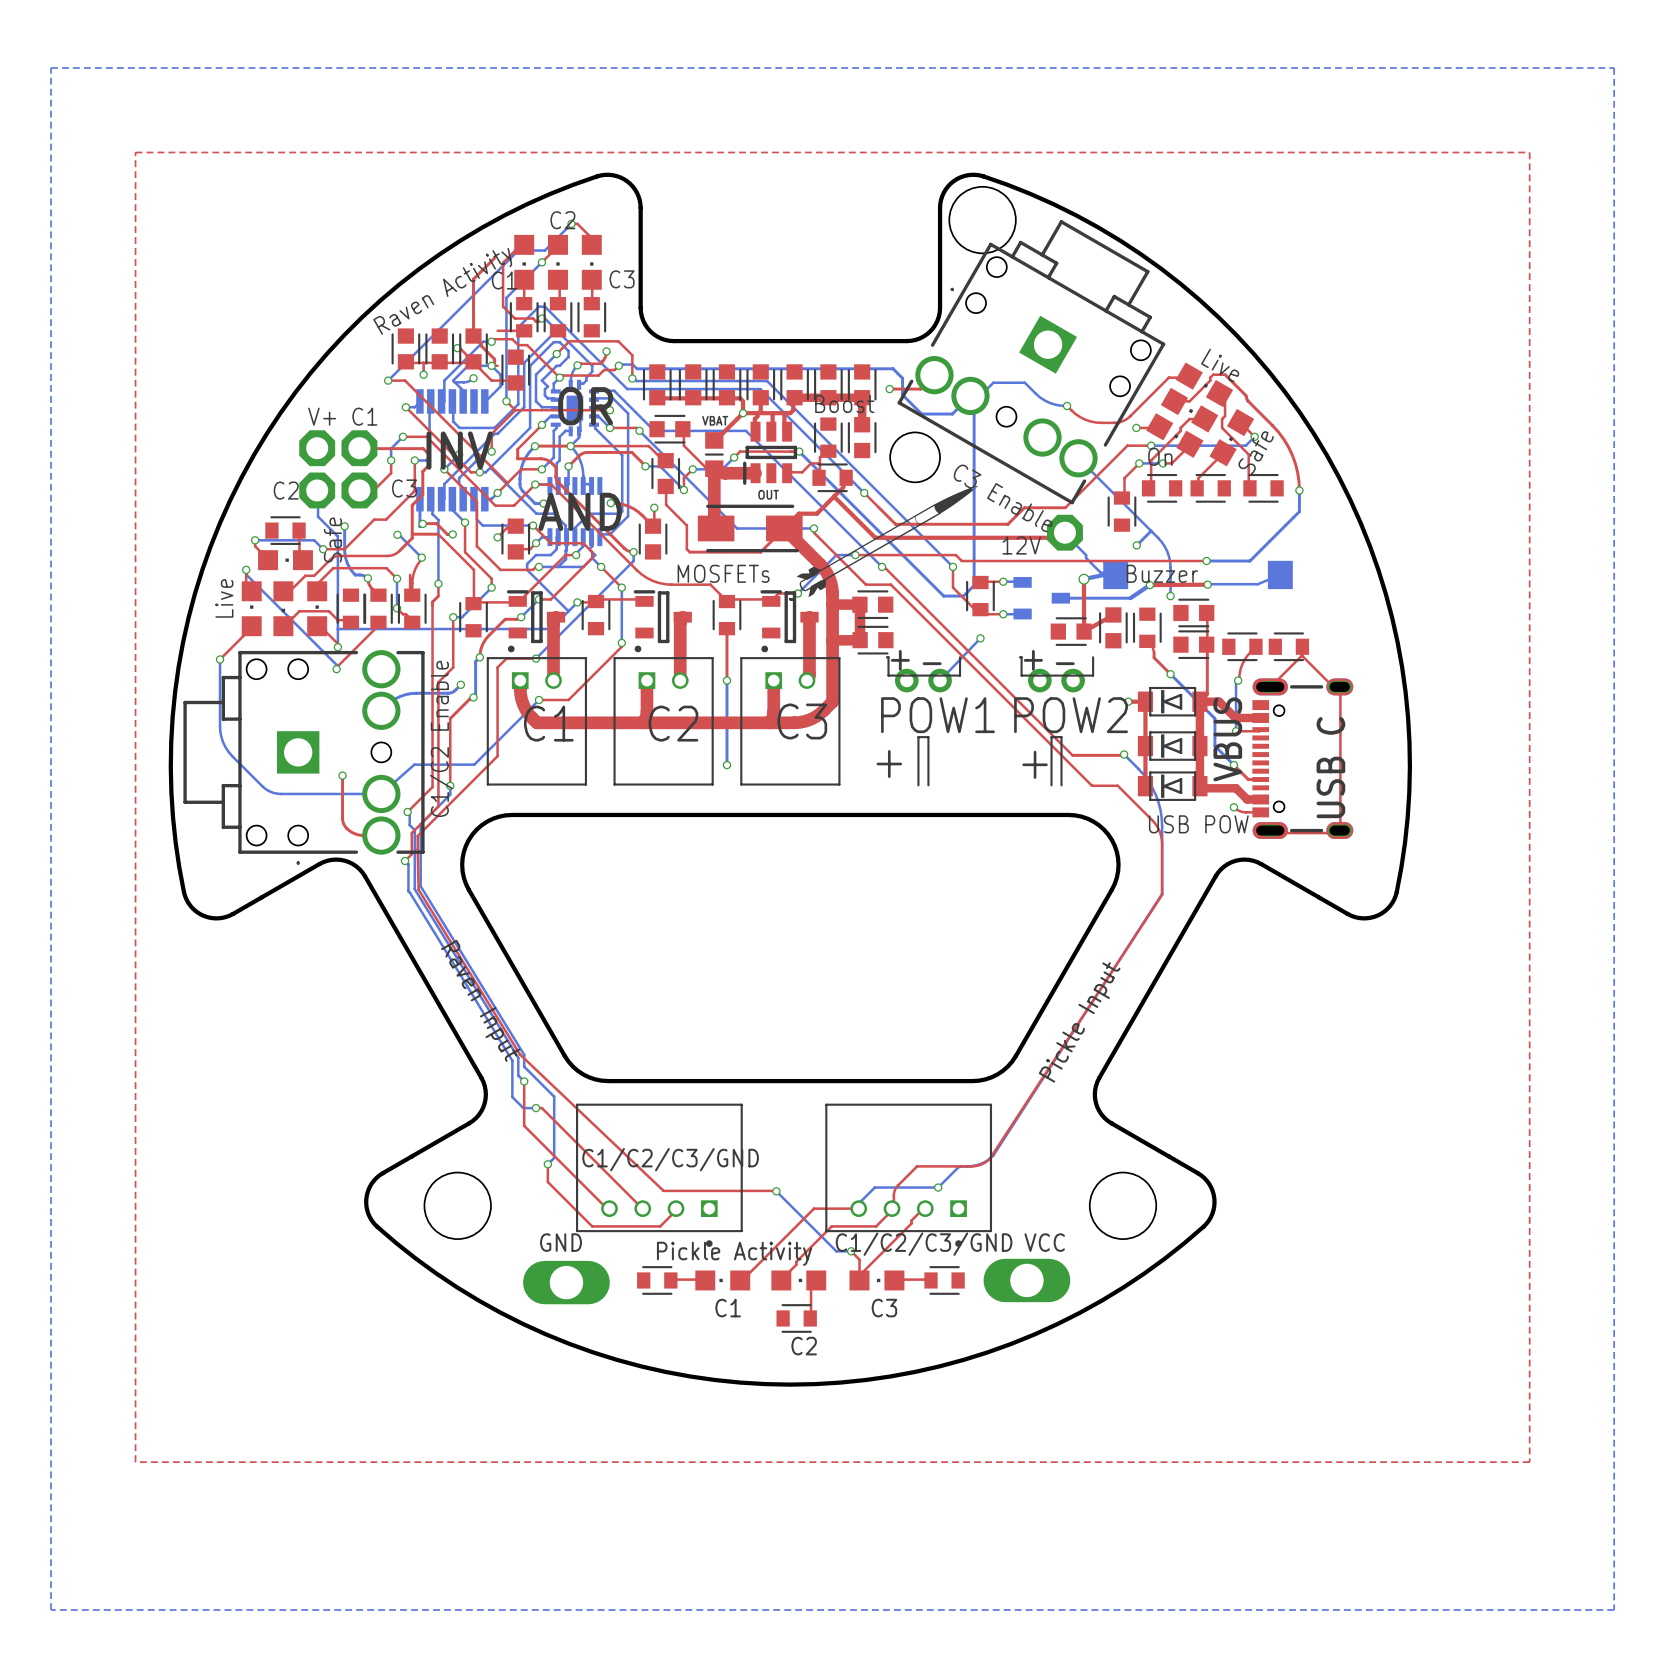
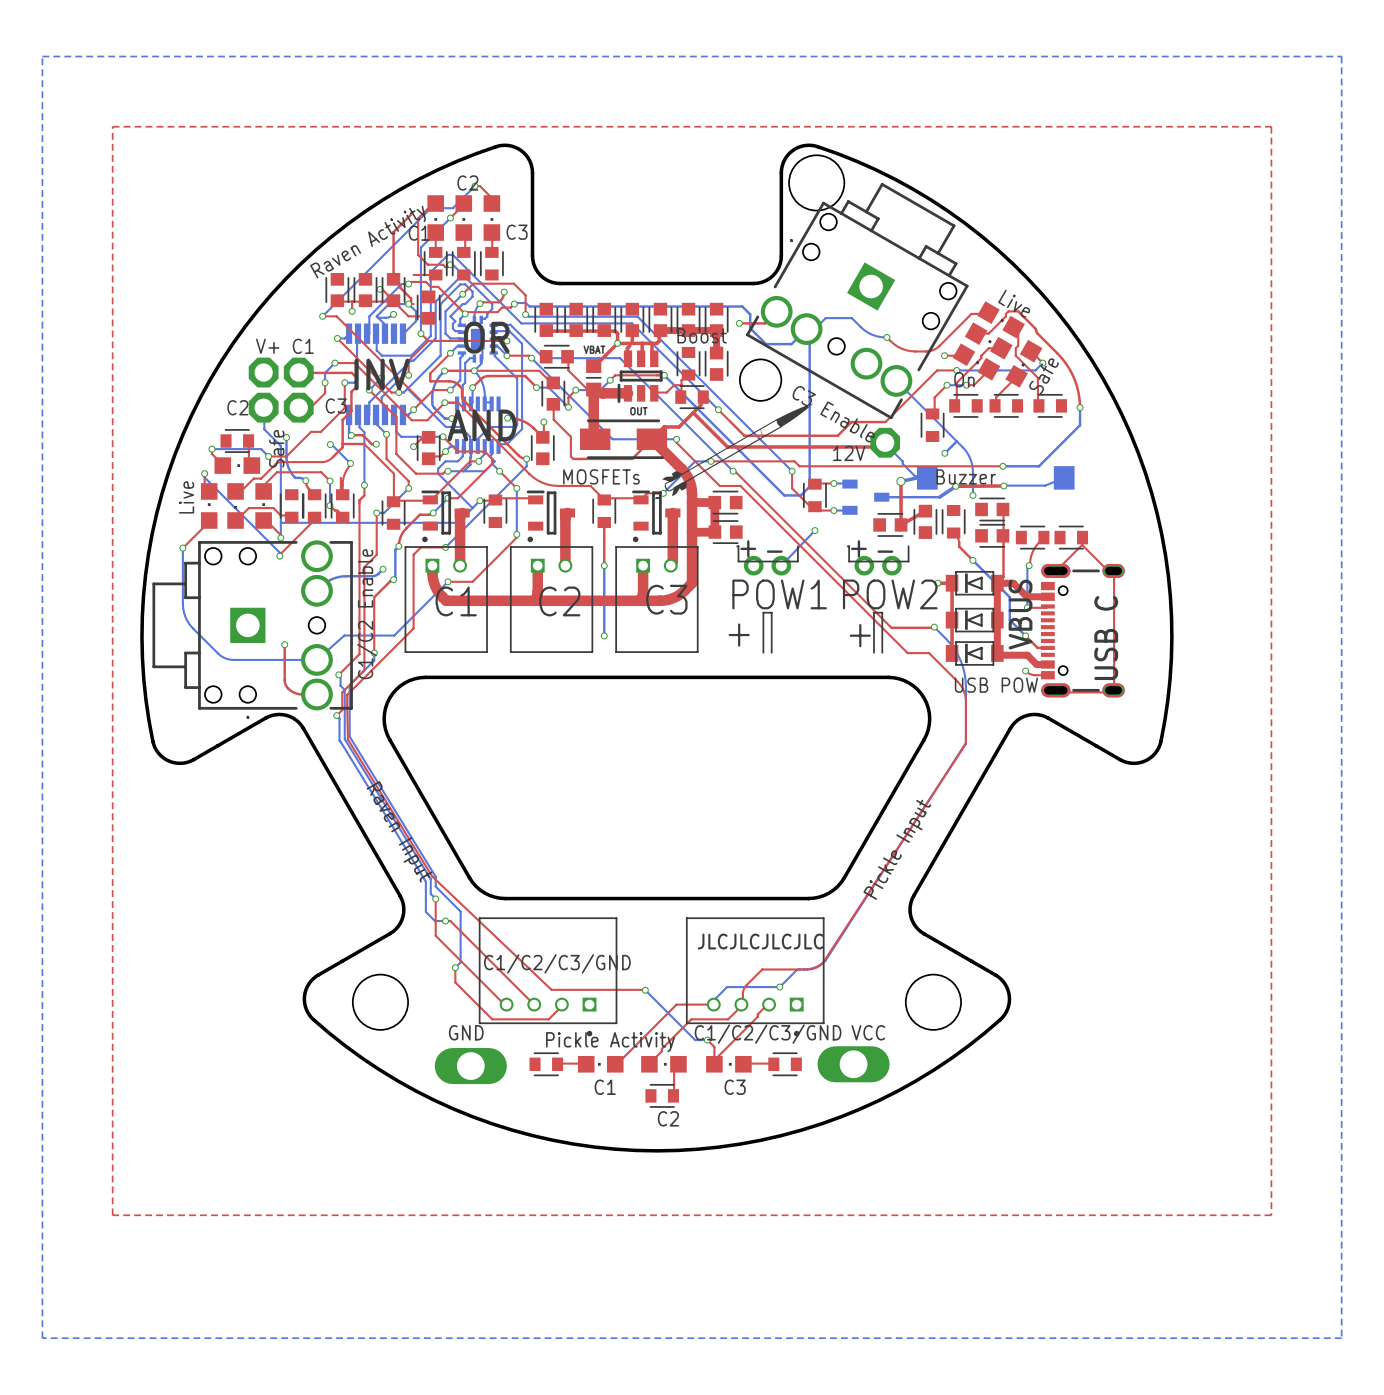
text: none -> JLCJLCJLCJLC (760, 941)

